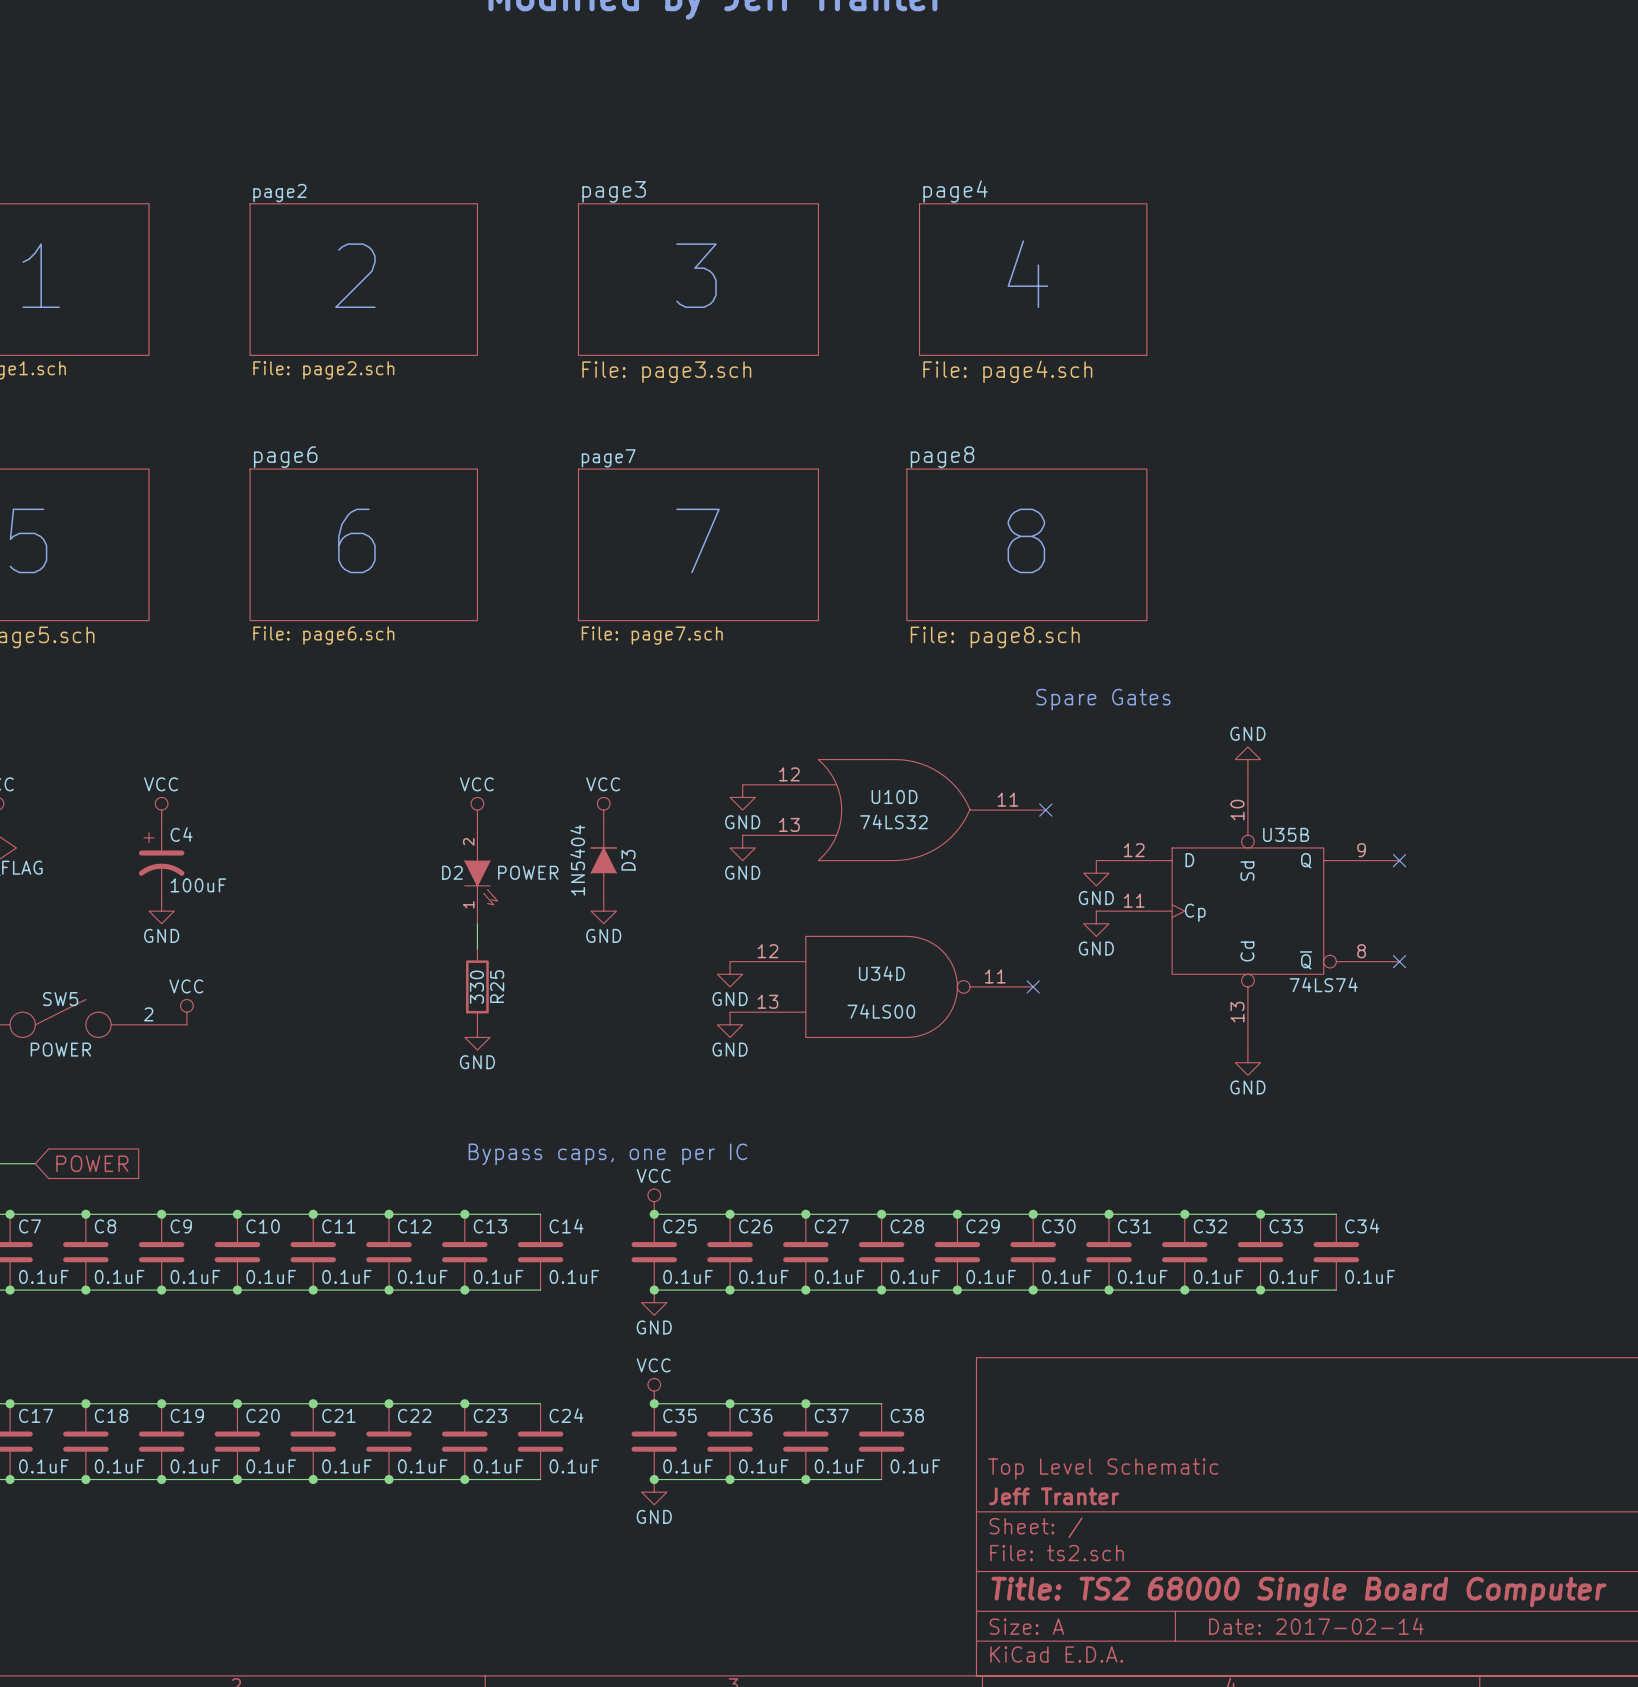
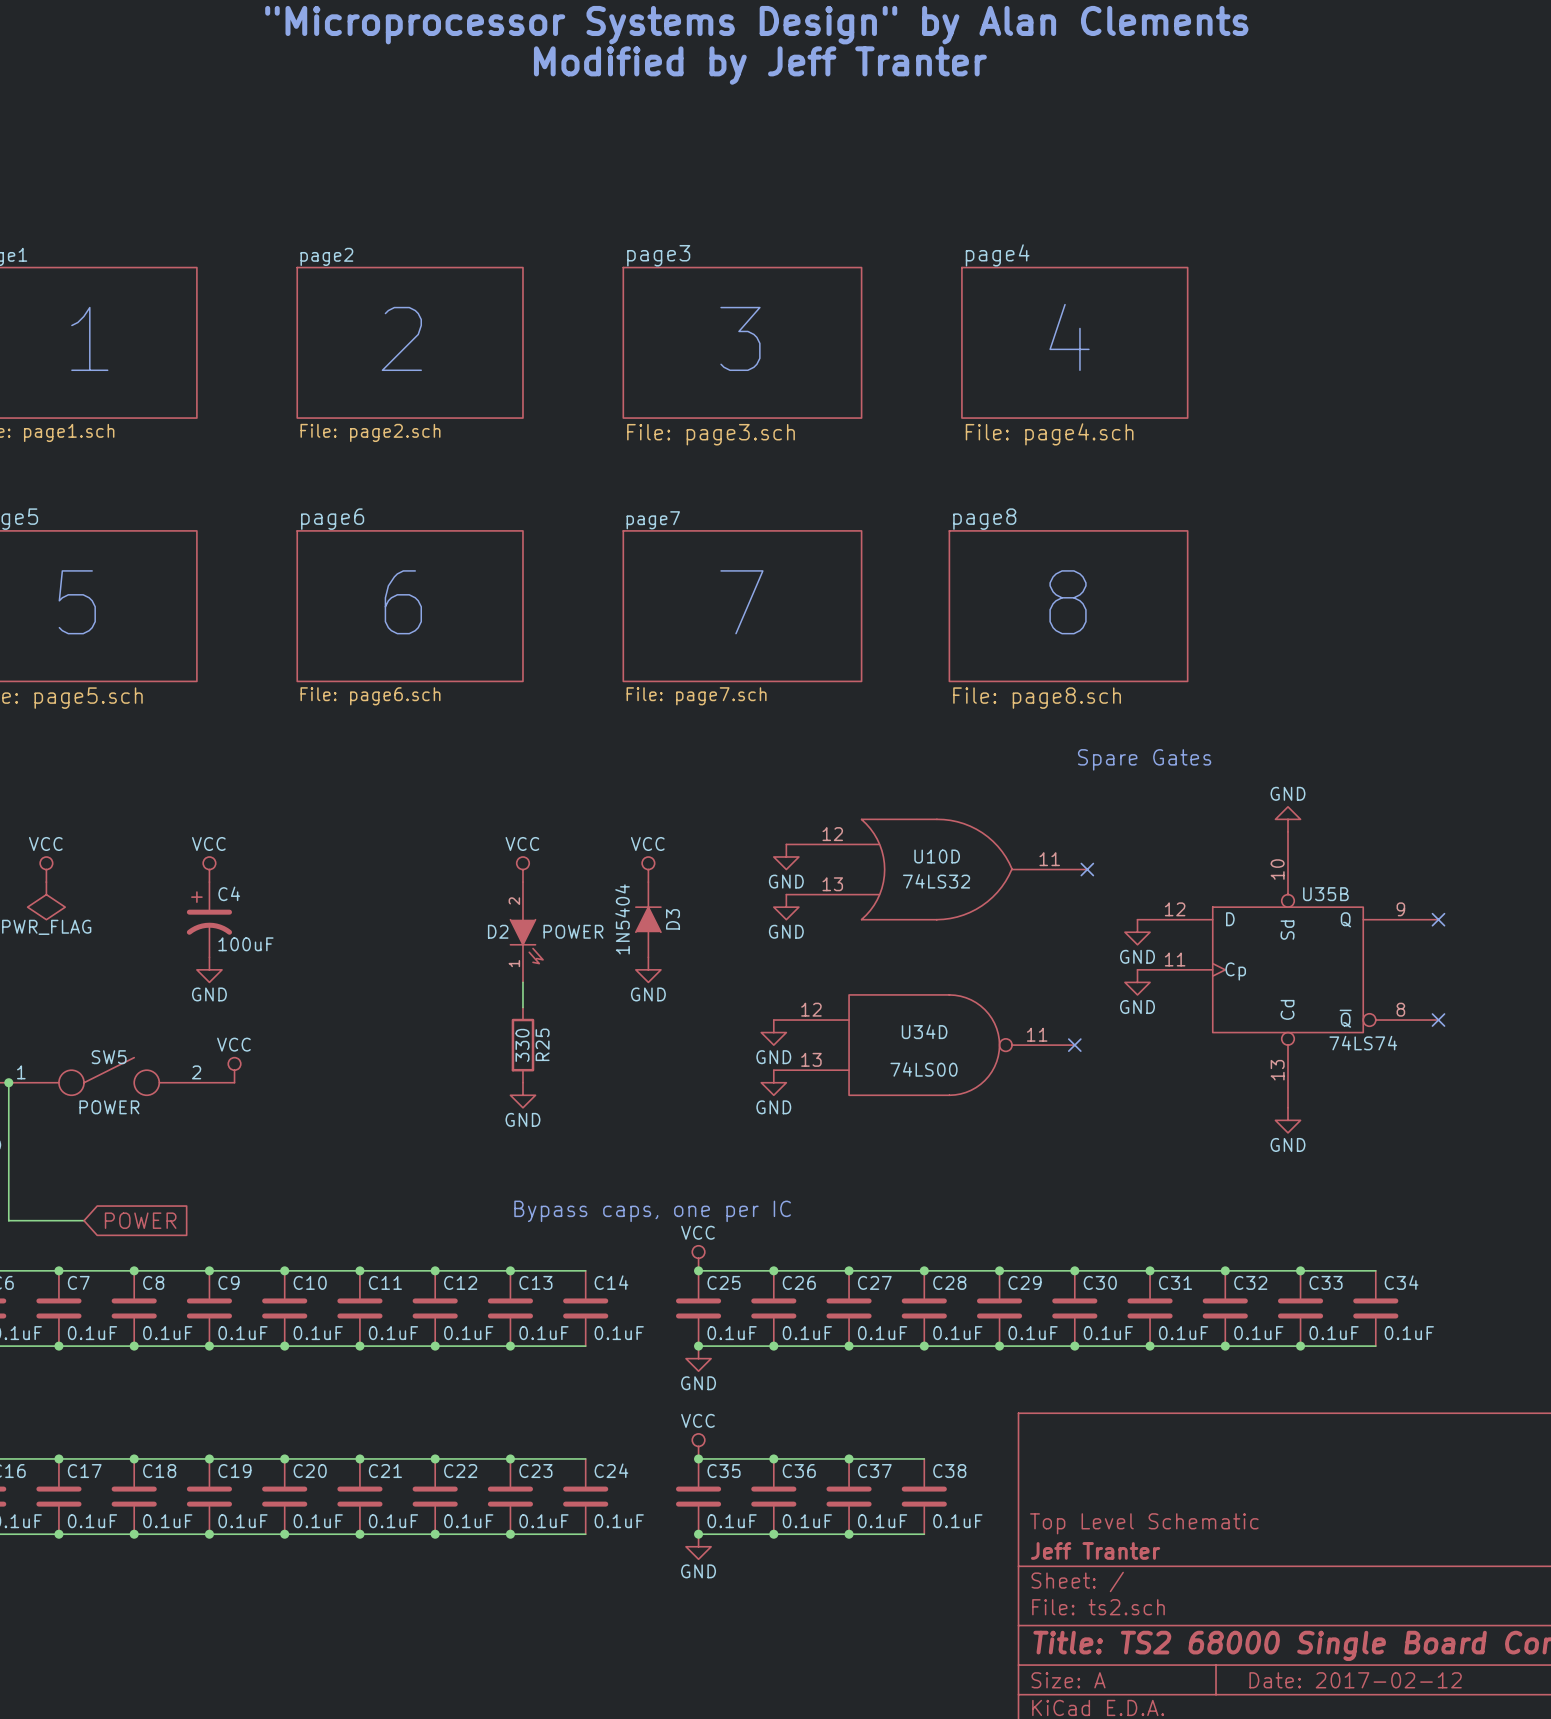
title block: Date: 2017-02-14 (1316, 1626) -> Date: 2017-02-12 (1355, 1680)

